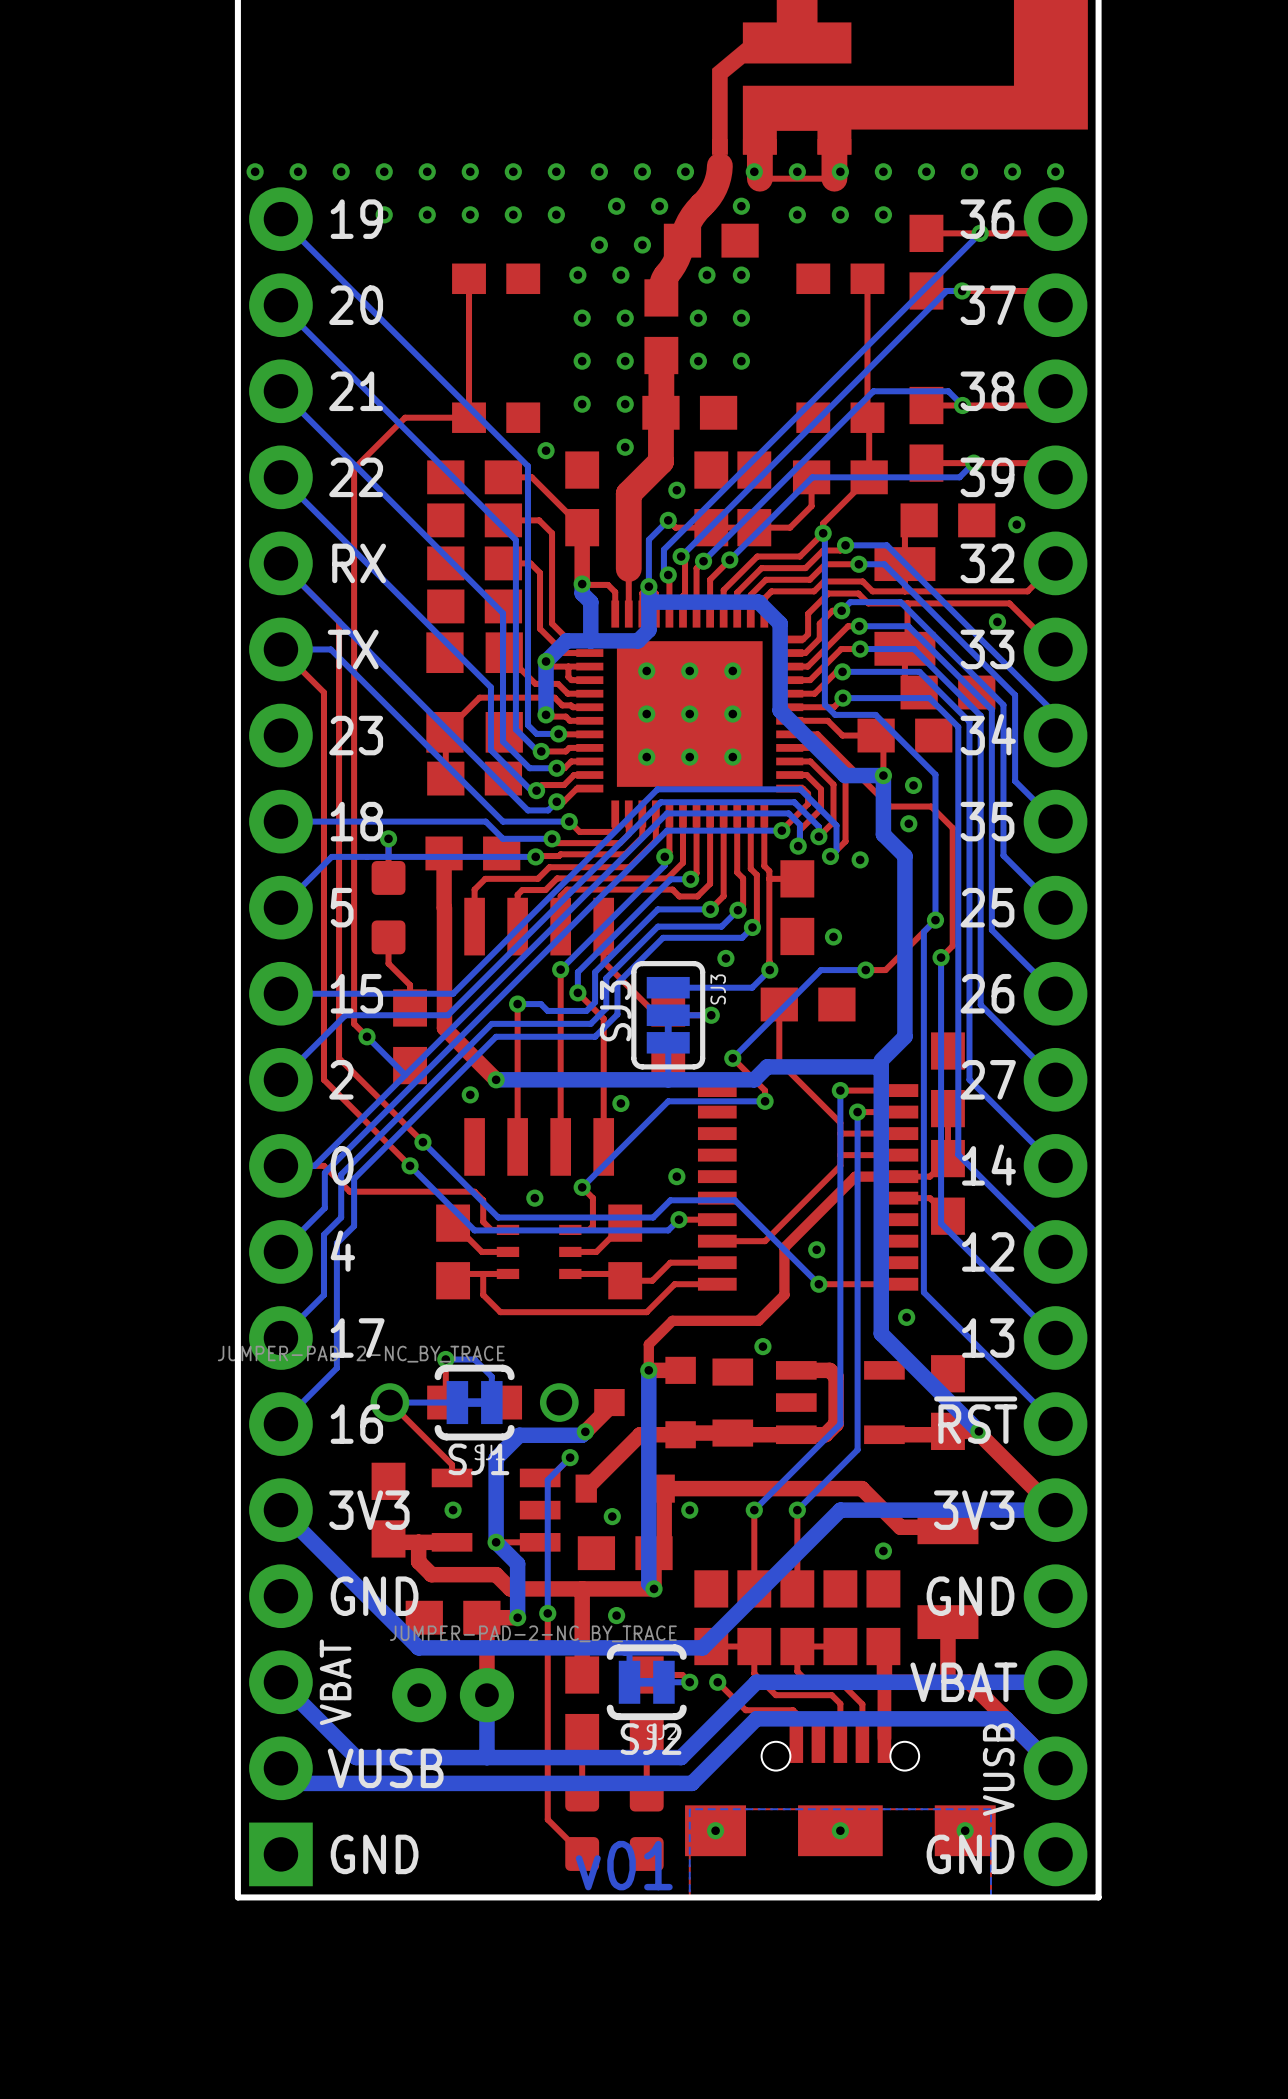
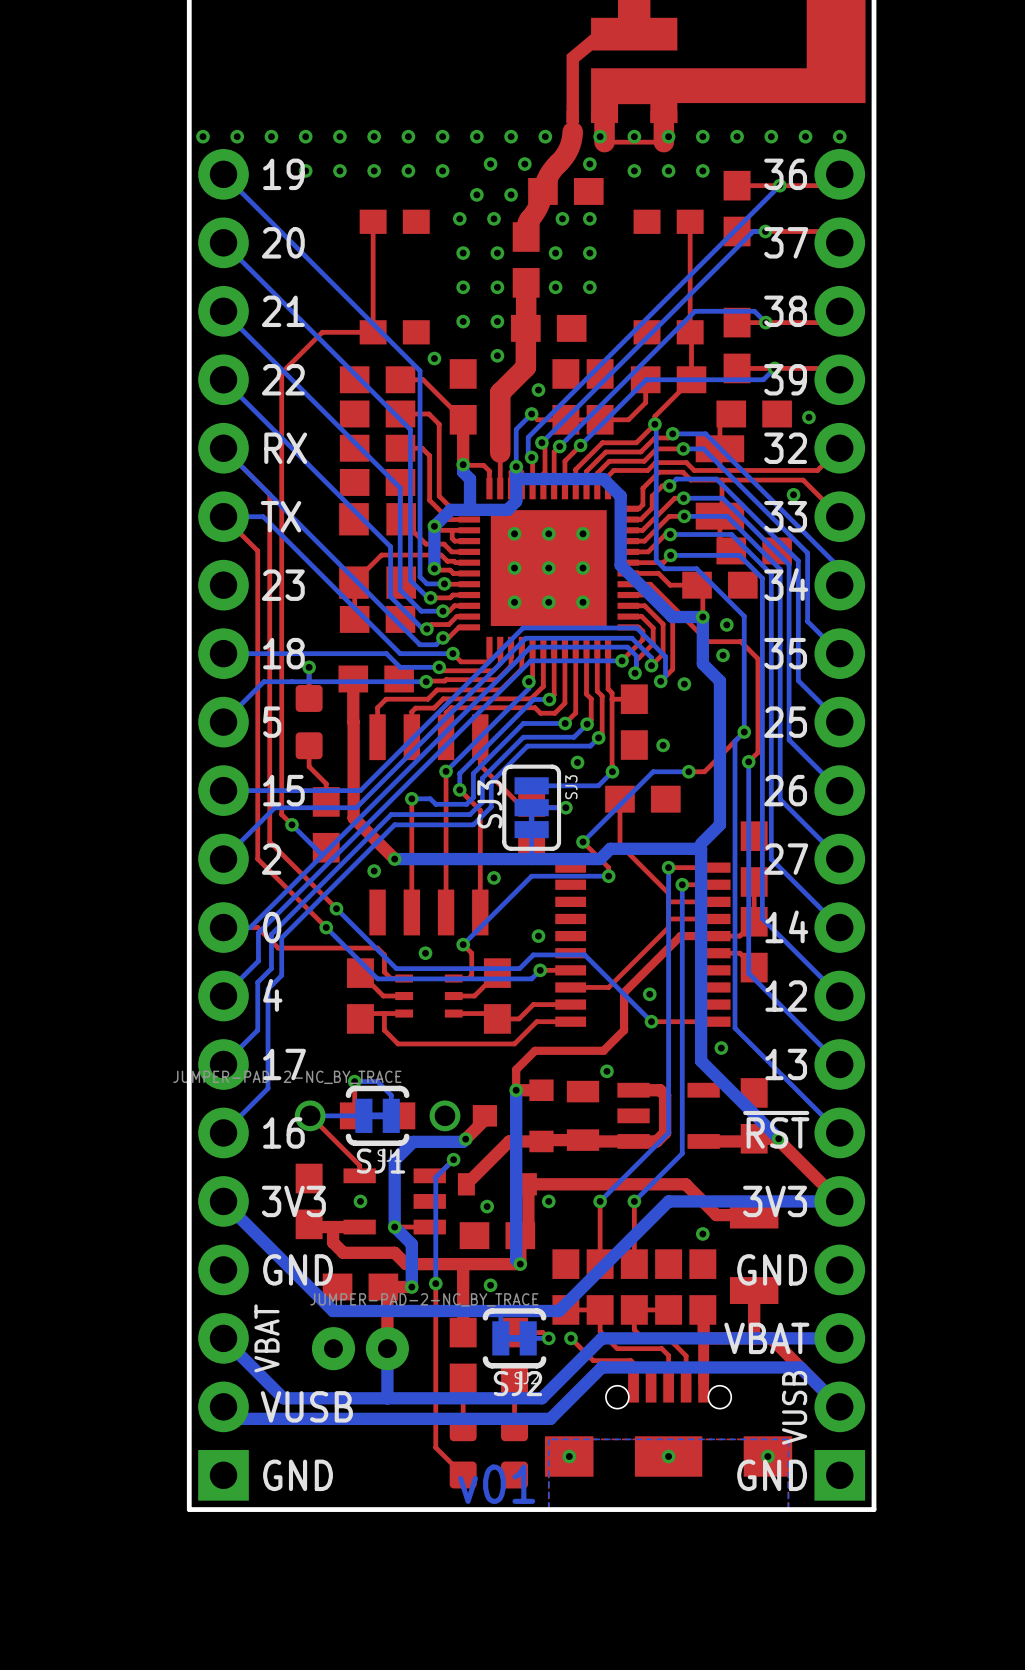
part footprint: [1023, 187, 1088, 1887] -> [814, 149, 866, 1501]

